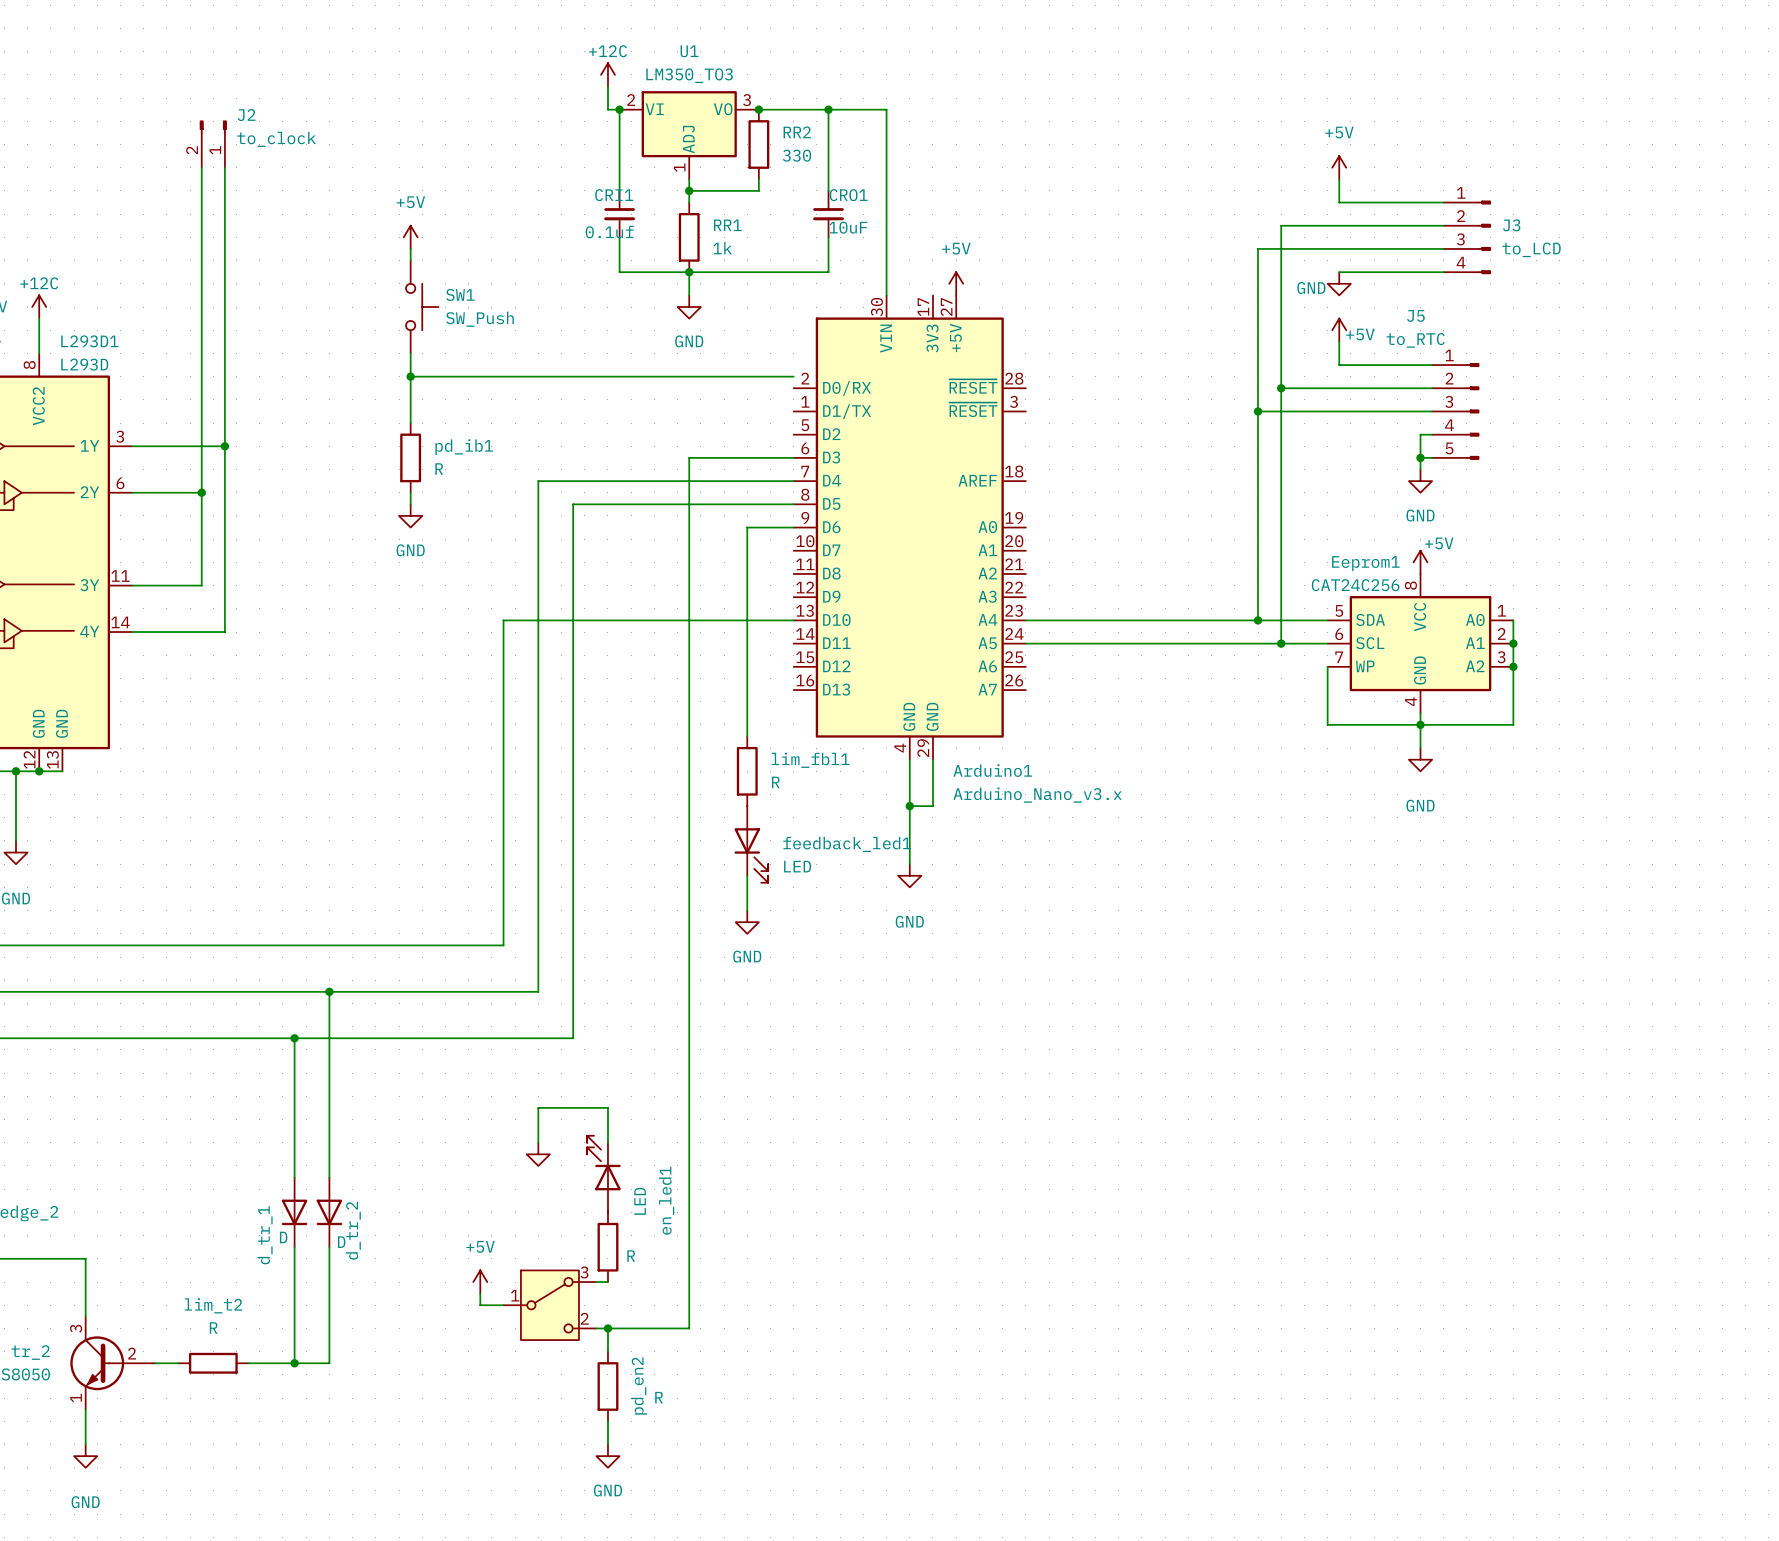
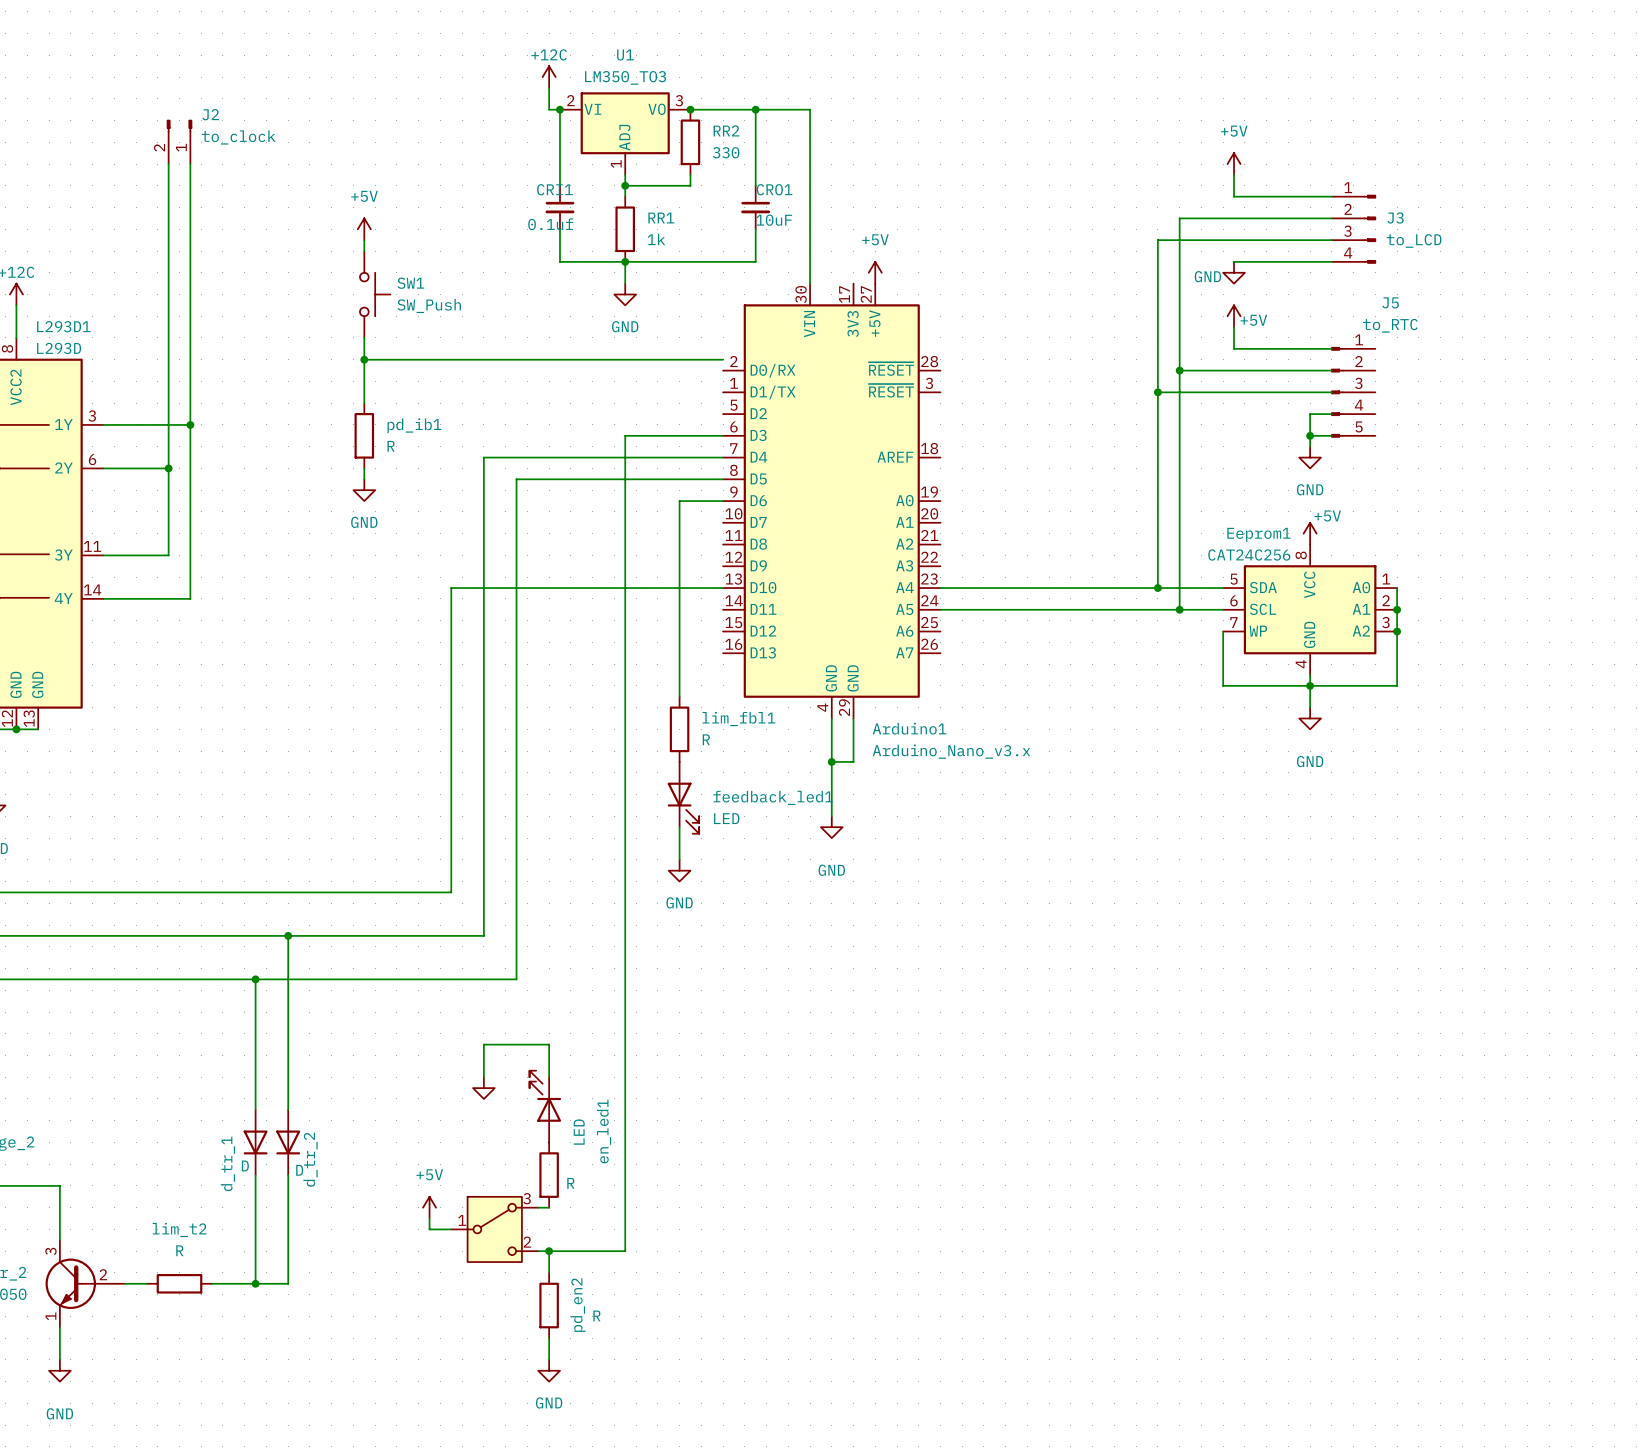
J5 flip: as is (1472, 411) -> left-right (1337, 392)

